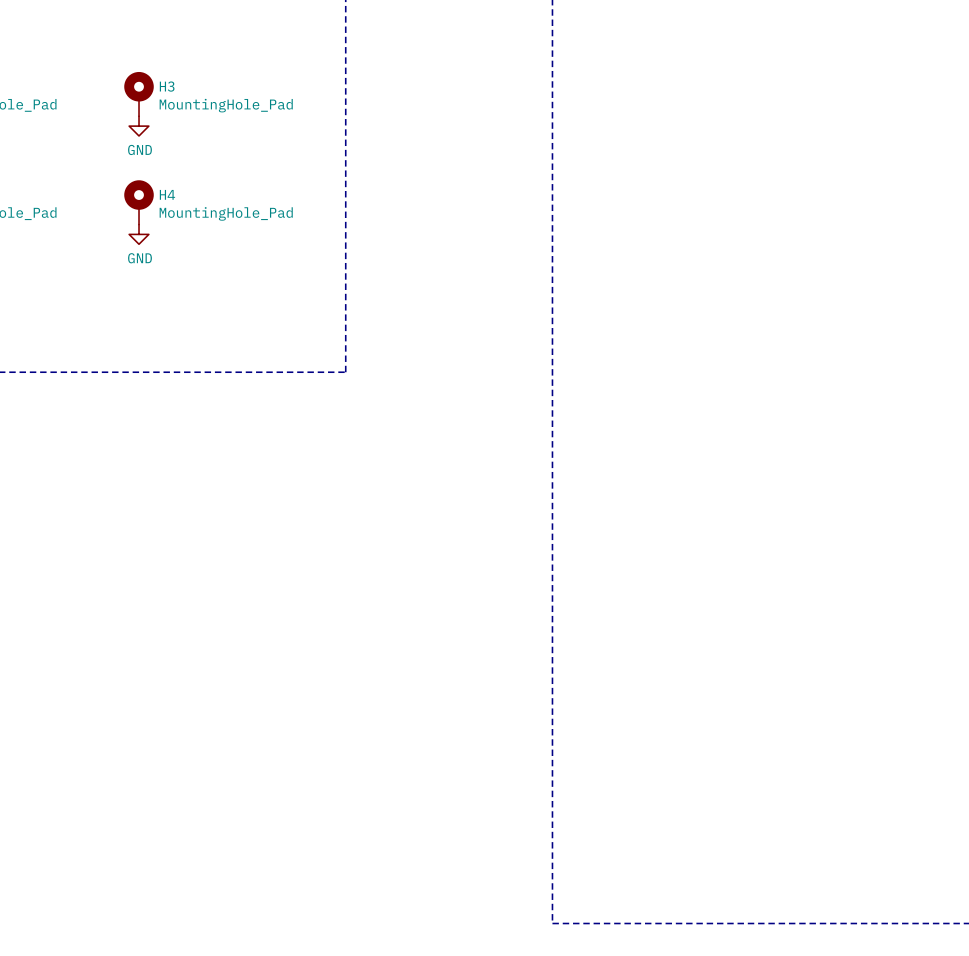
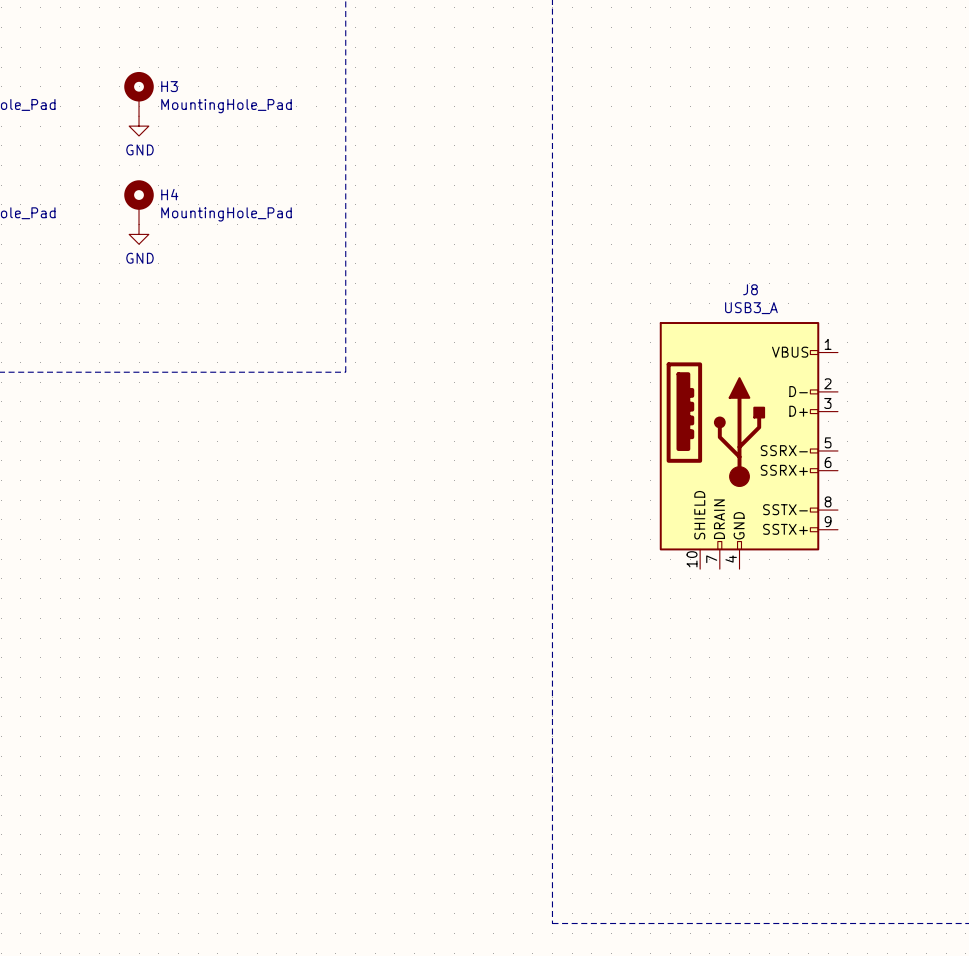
J8: none -> USB3_A (748, 445)

